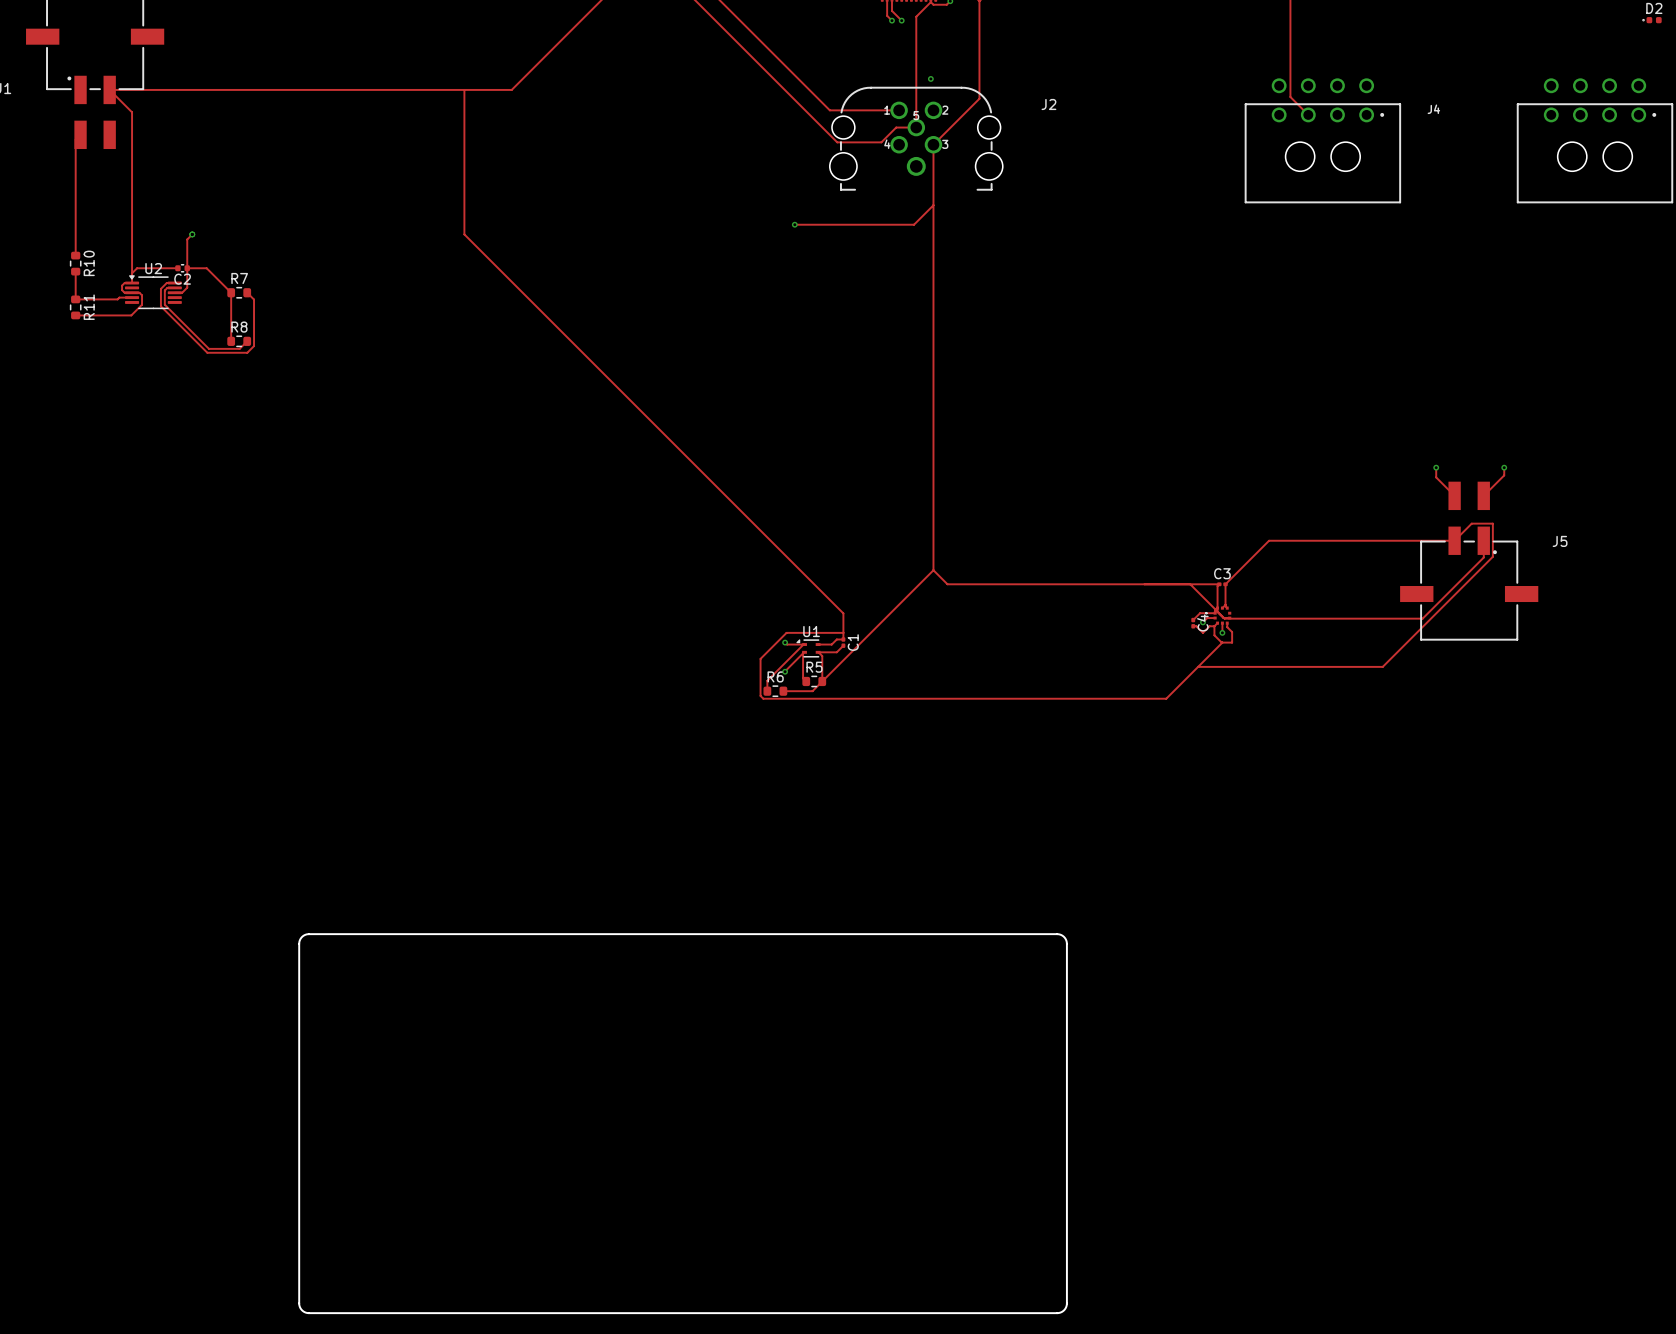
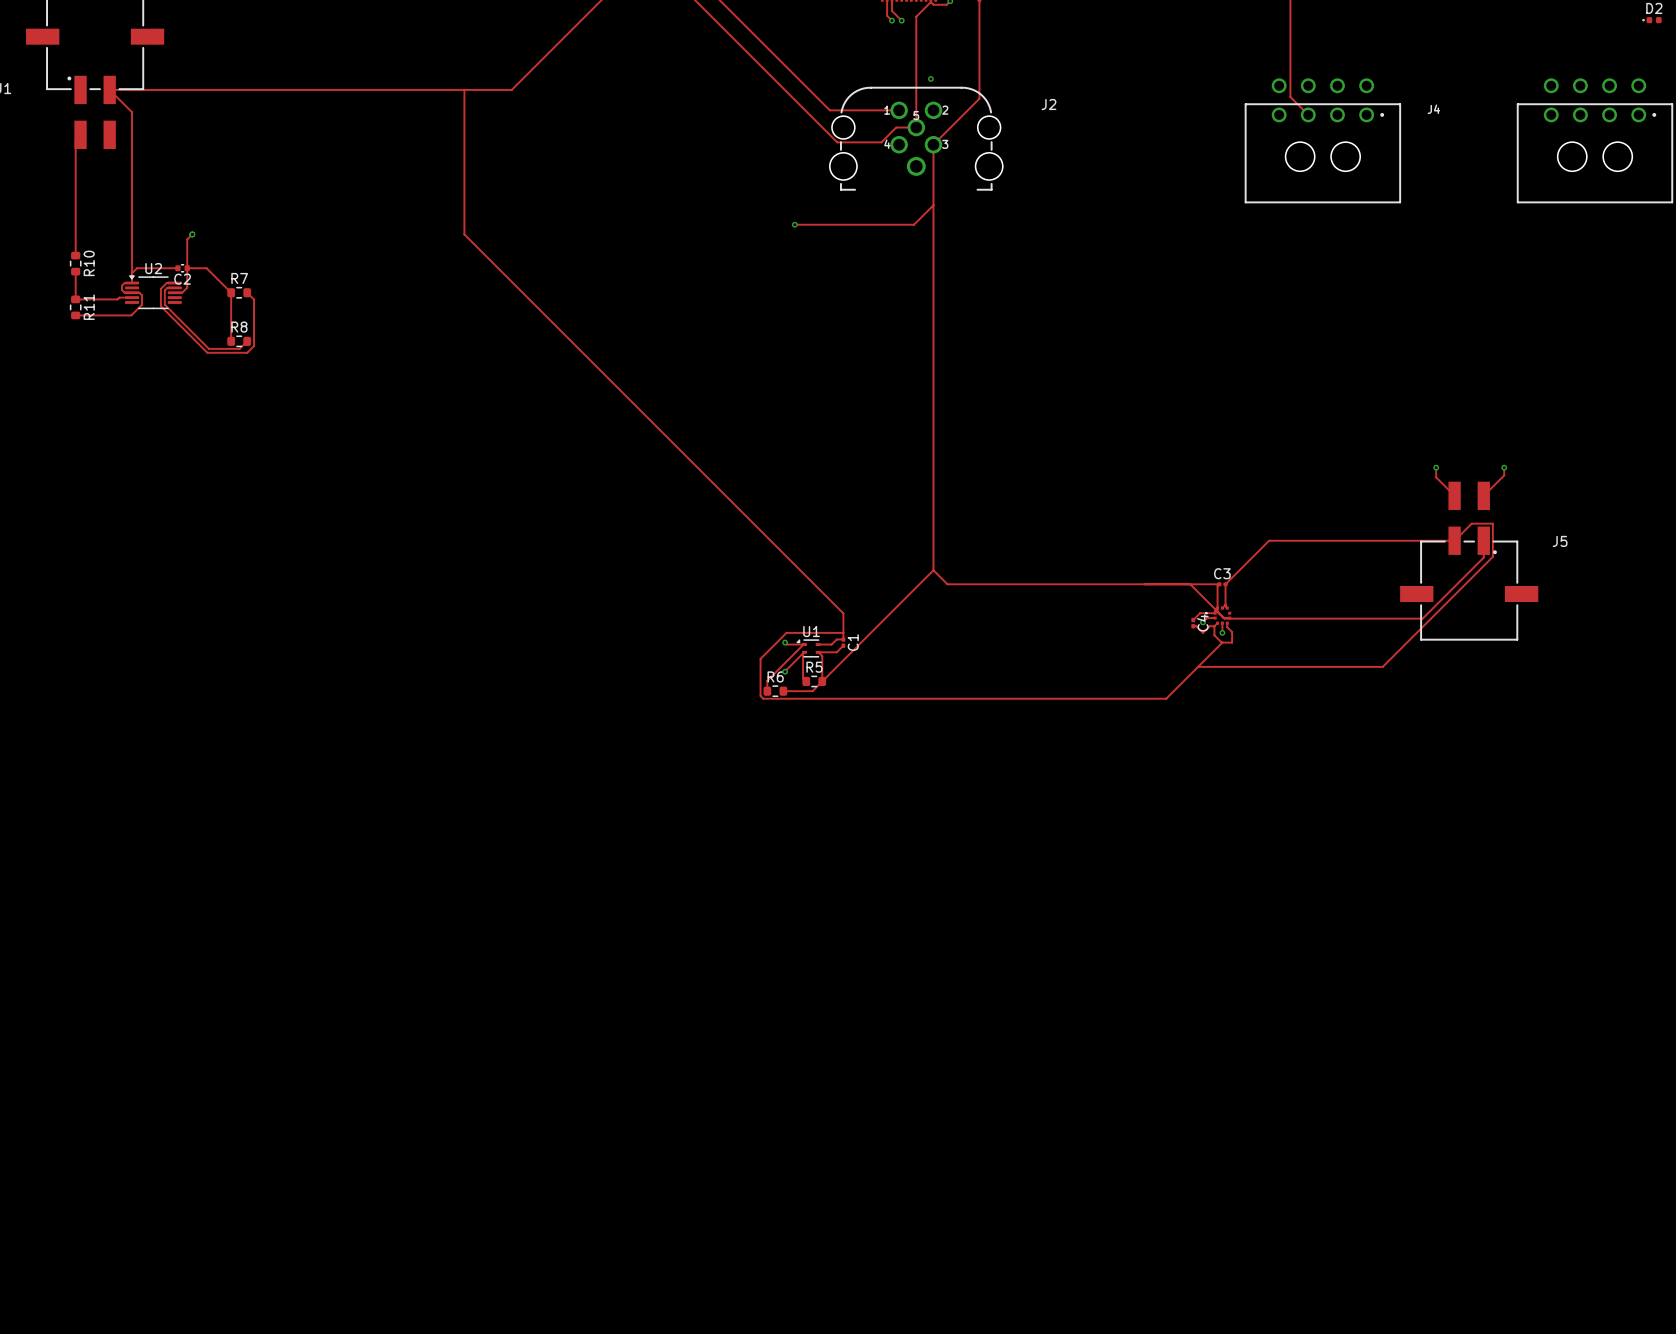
board edge: (308, 934) (1061, 935) (1066, 943) (1065, 1307) (1057, 1313) (304, 1312) (299, 1303) (299, 943) (302, 936) (308, 934) -> none

